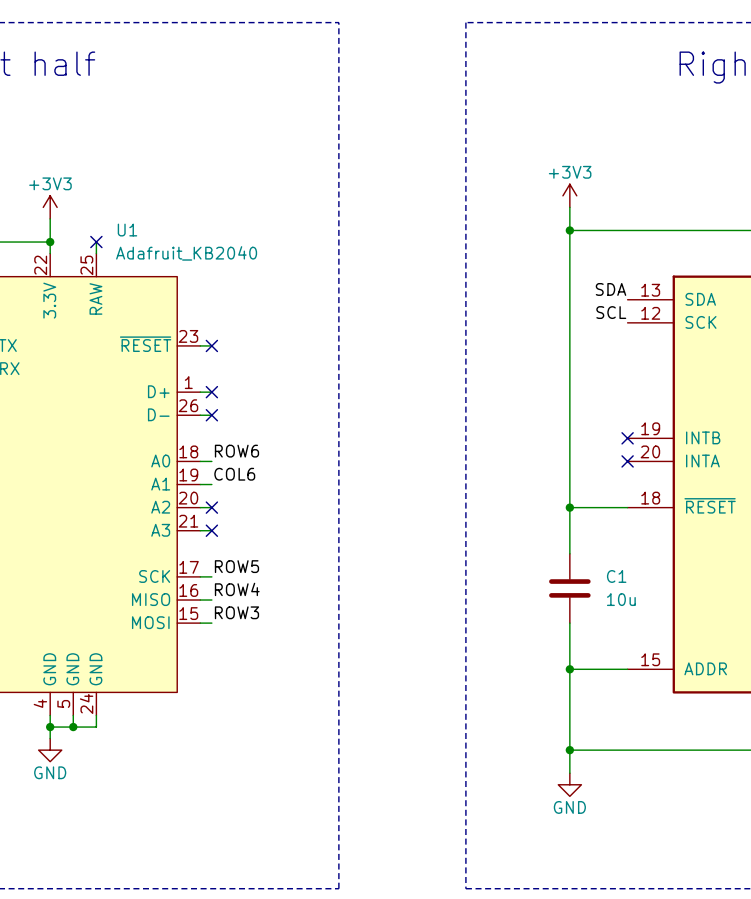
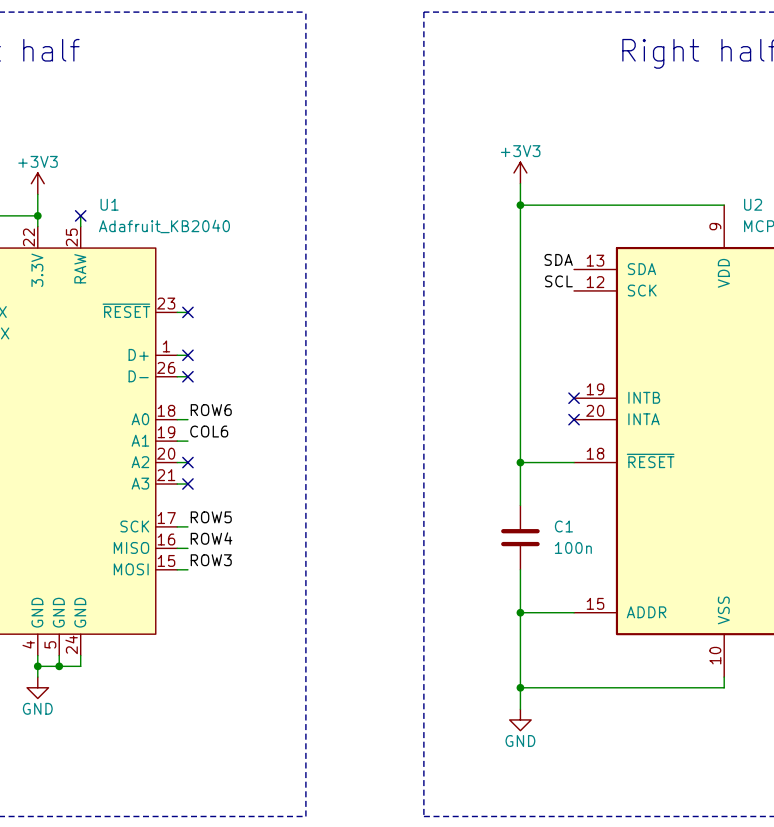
C1 value: 10u (621, 599) -> 100n (573, 547)

